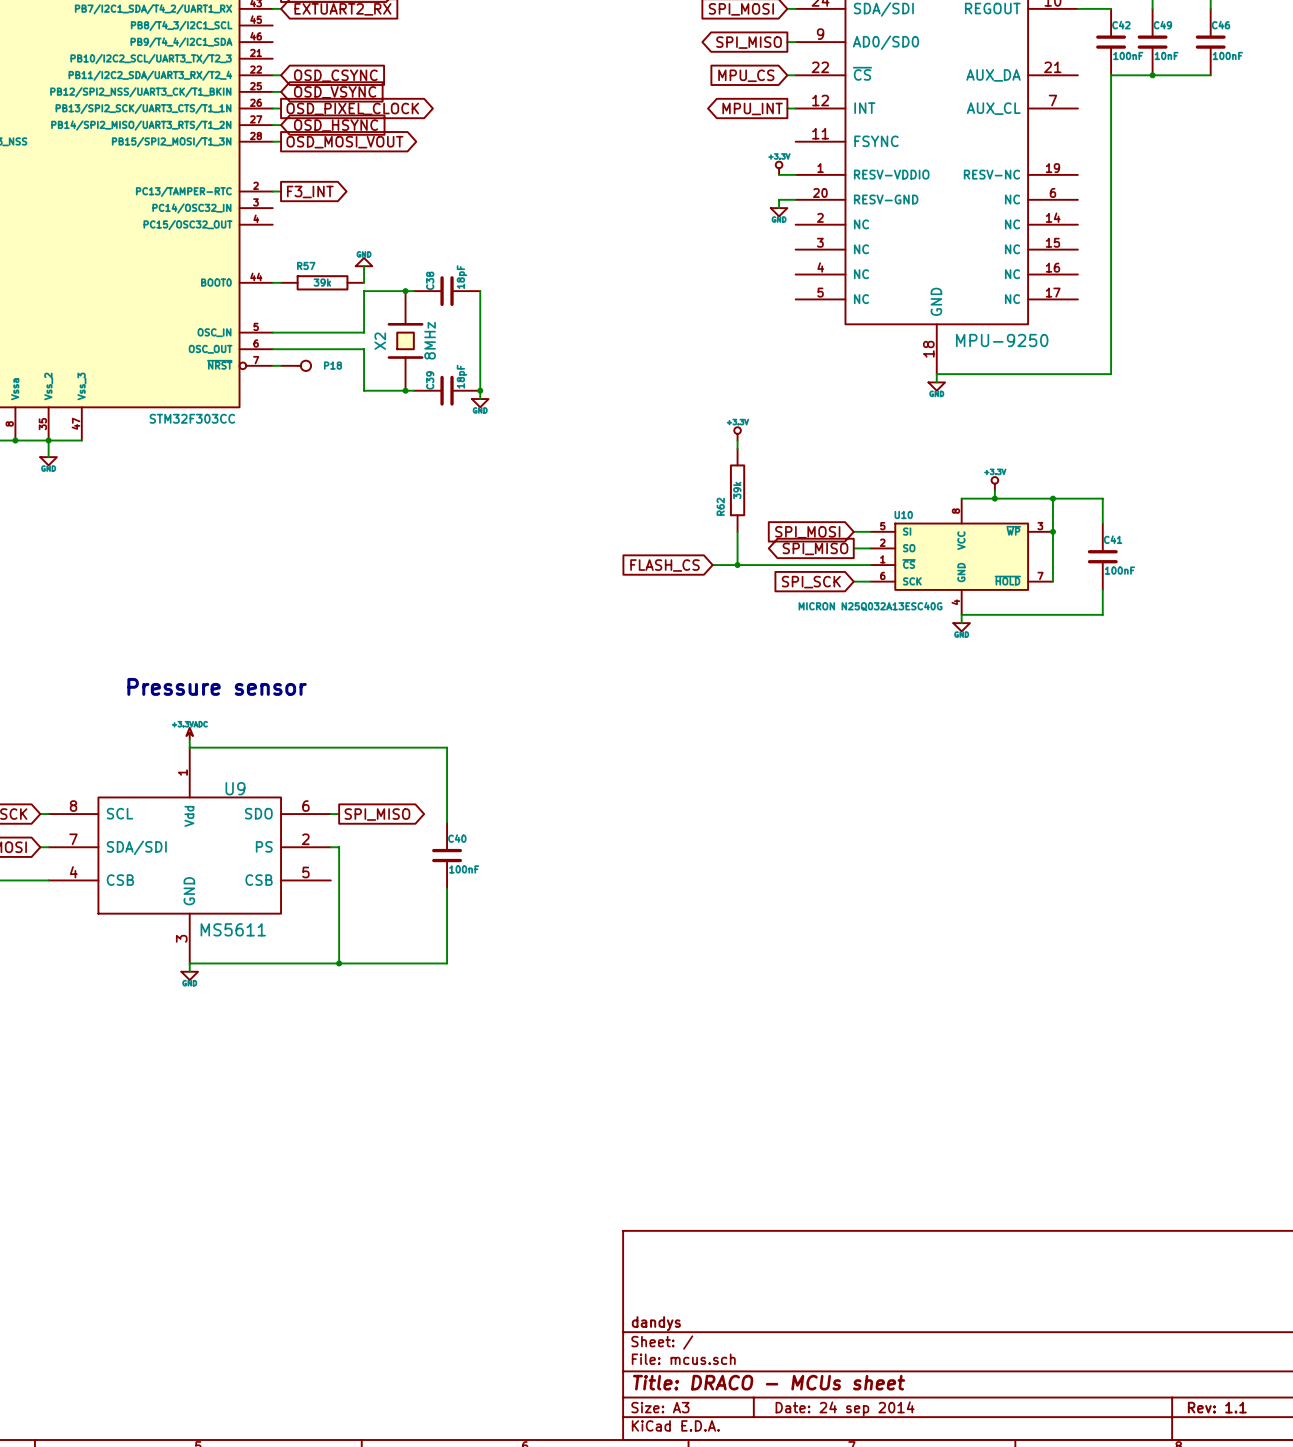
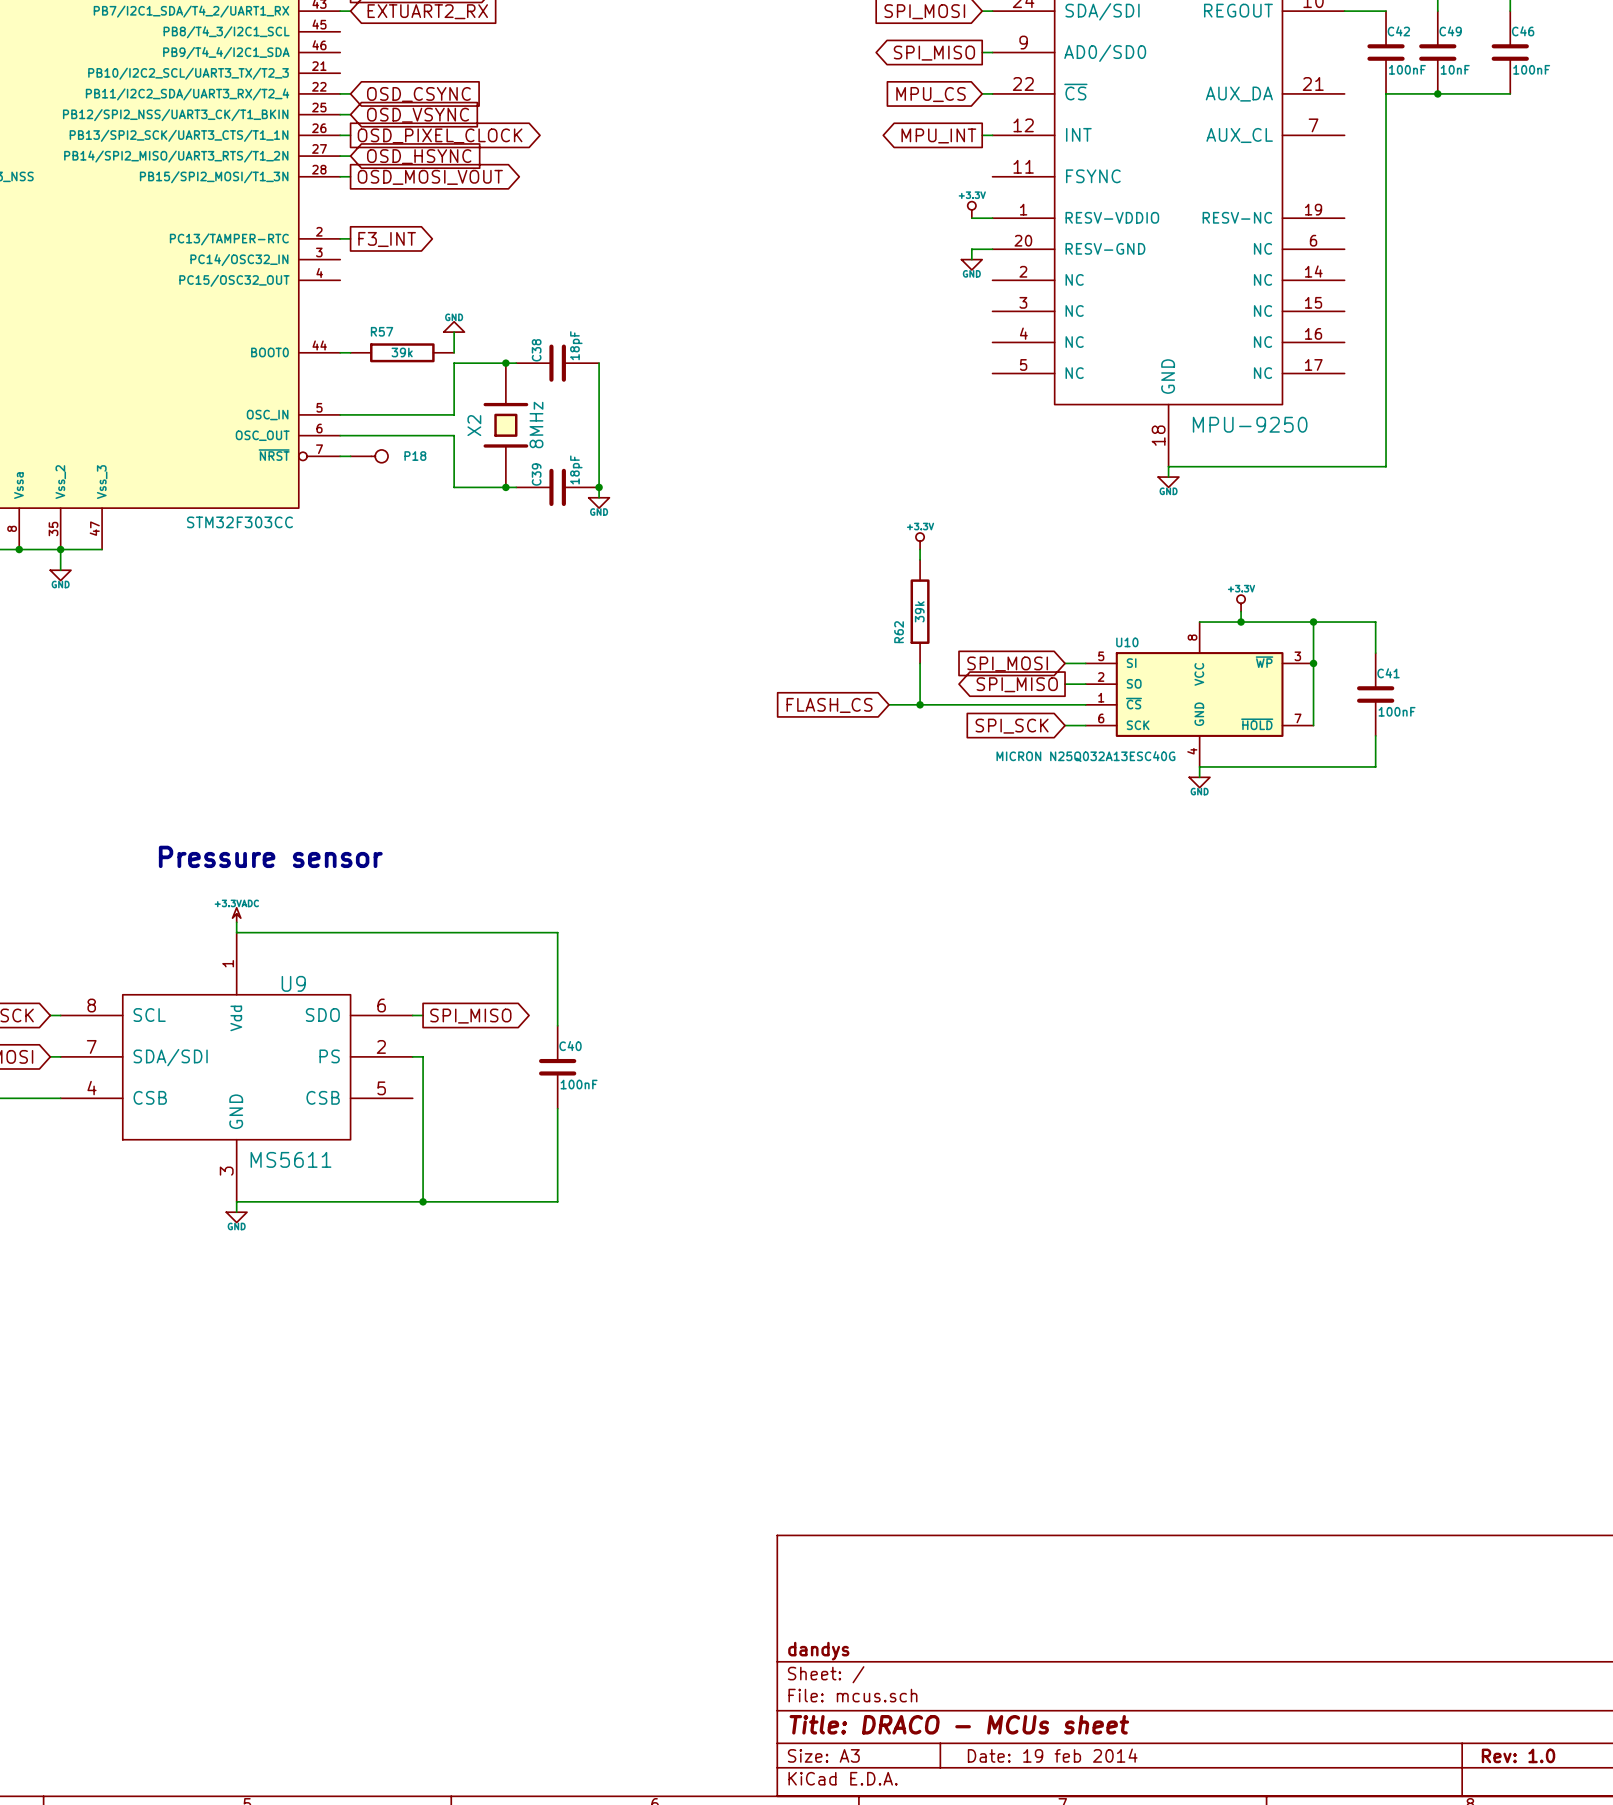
title block: Rev: 1.1 (1217, 1407) -> Rev: 1.0 (1518, 1755)
title block: Date: 24 sep 2014 (845, 1409) -> Date: 19 feb 2014 (1052, 1755)

